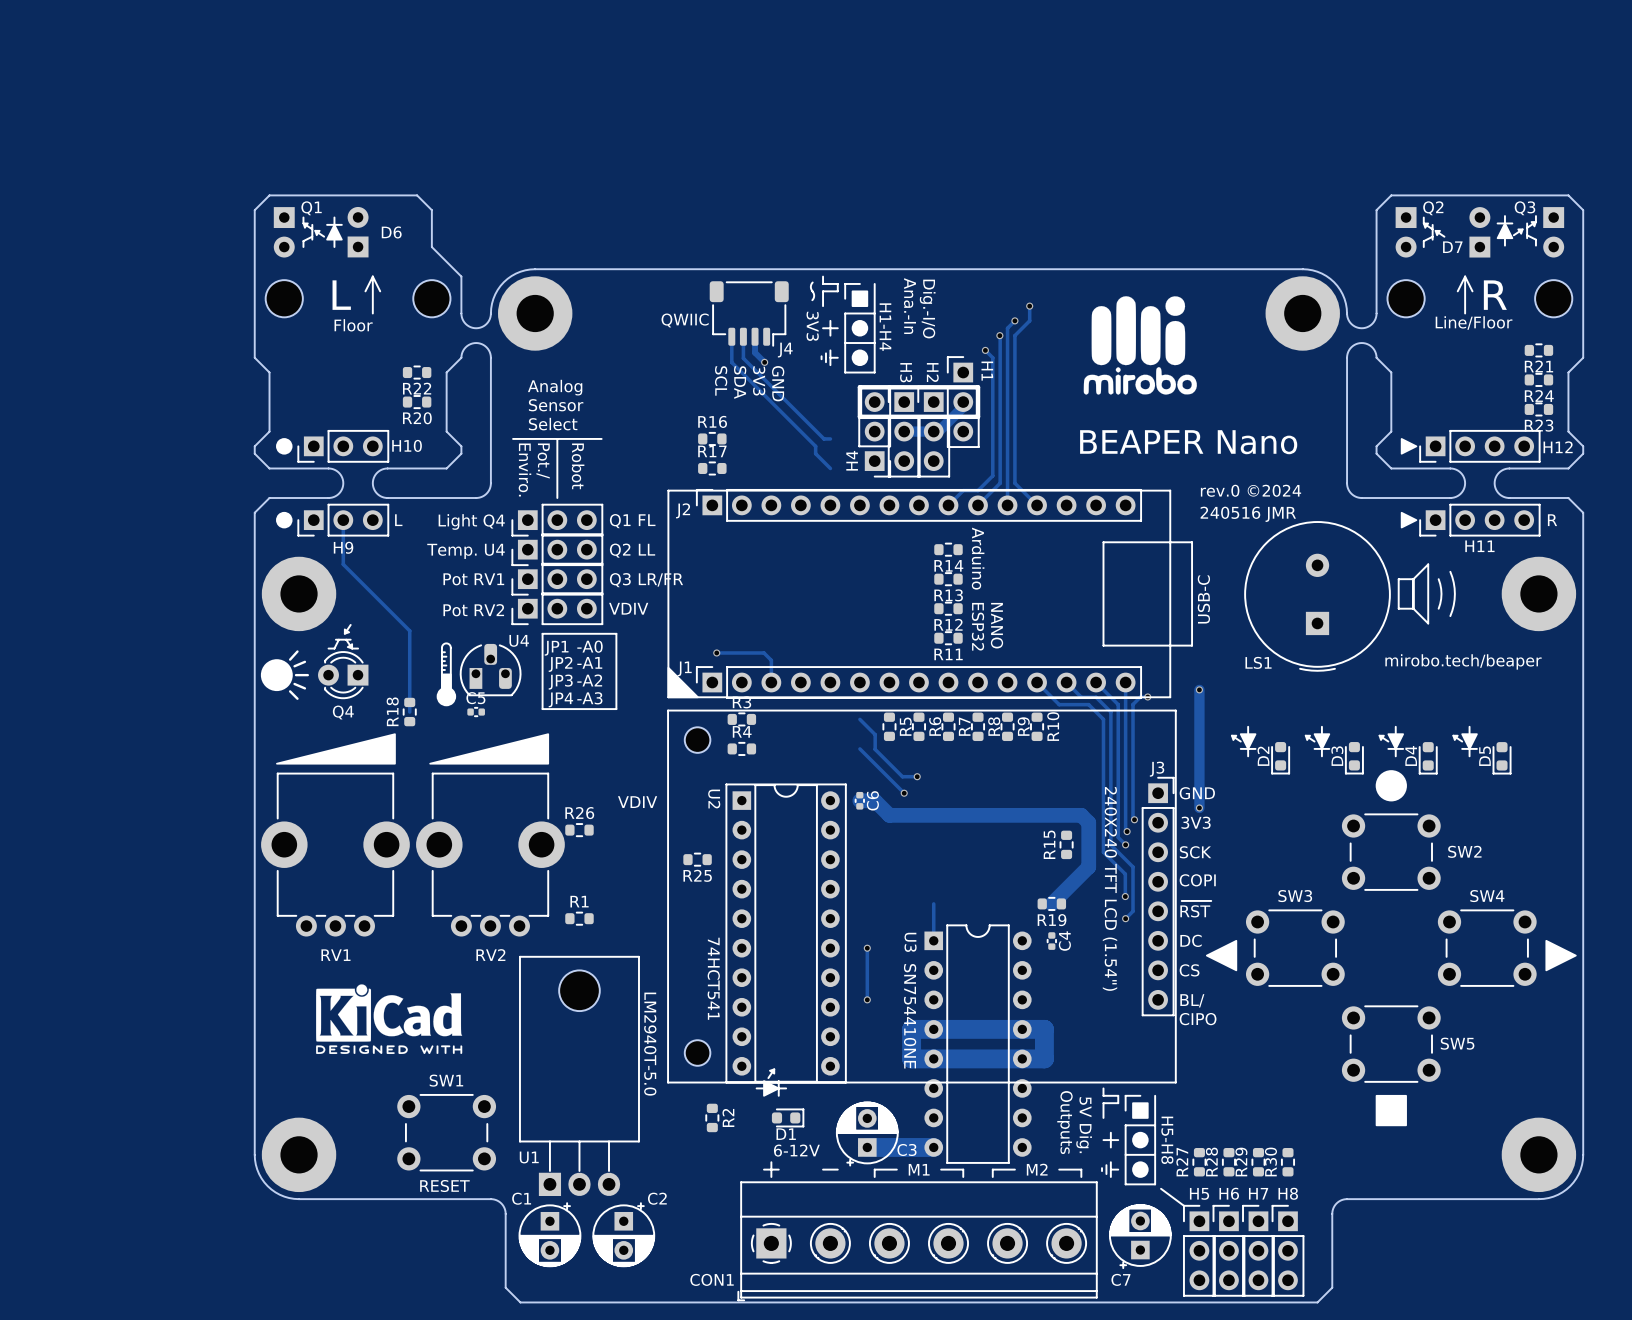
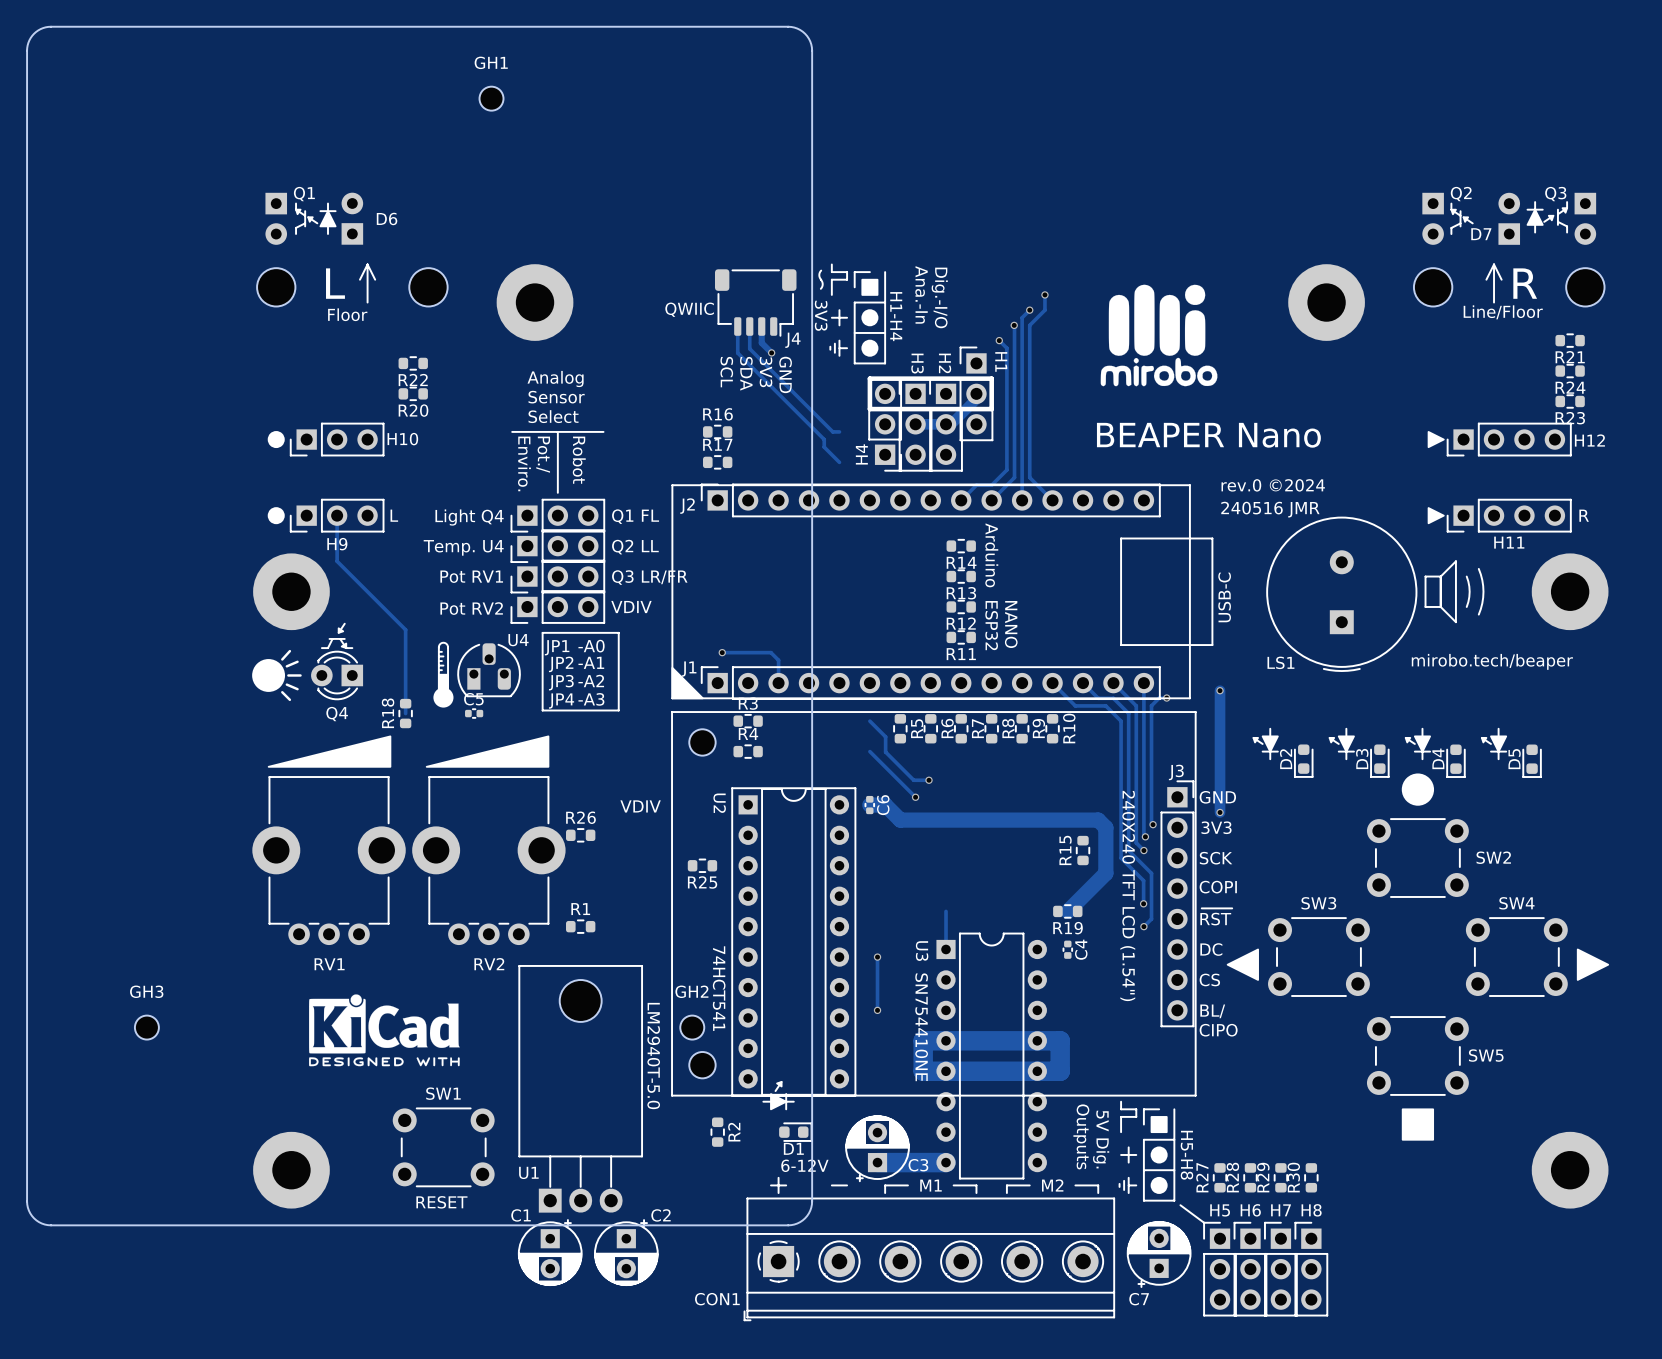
board edge: none -> (51, 26) (788, 26) (800, 29) (808, 38) (812, 50) (812, 1201) (808, 1213) (800, 1222) (788, 1225) (51, 1225) (39, 1222) (30, 1213) (27, 1201) (27, 50) (29, 40) (34, 33) (43, 28) (51, 26)
GH1: none -> (491, 98)
board edge: (269, 195) (254, 210) (254, 357) (269, 372) (269, 431) (254, 446) (254, 453) (269, 468) (333, 469) (340, 474) (343, 483) (340, 491) (333, 497) (269, 498) (254, 512) (254, 1154) (259, 1174) (271, 1189) (284, 1196) (299, 1199) (497, 1200) (502, 1204) (505, 1212) (505, 1287) (520, 1302) (1317, 1302) (1332, 1287) (1332, 1212) (1335, 1204) (1340, 1200) (1543, 1198) (1558, 1194) (1573, 1182) (1580, 1169) (1583, 1154) (1583, 512) (1568, 498) (1504, 497) (1497, 491) (1494, 483) (1497, 474) (1504, 469) (1568, 468) (1583, 453) (1583, 446) (1568, 431) (1568, 372) (1583, 357) (1583, 210) (1568, 195) (1391, 195) (1376, 210) (1376, 317) (1370, 325) (1361, 328) (1353, 325) (1348, 320) (1344, 298) (1334, 282) (1317, 271) (1302, 269) (530, 269) (515, 273) (503, 282) (493, 298) (488, 320) (483, 326) (474, 328) (465, 323) (461, 317) (461, 276) (431, 247) (431, 210) (417, 195) (269, 195) -> none
board edge: (461, 357) (446, 372) (446, 431) (461, 446) (461, 453) (446, 468) (387, 468) (380, 470) (375, 474) (372, 483) (375, 491) (380, 496) (387, 498) (476, 498) (482, 496) (488, 491) (490, 483) (490, 353) (485, 346) (474, 343) (465, 347) (461, 357) -> none
board edge: (1347, 357) (1347, 483) (1350, 492) (1361, 498) (1450, 498) (1459, 494) (1464, 488) (1464, 481) (1457, 470) (1450, 468) (1391, 468) (1376, 453) (1376, 446) (1391, 431) (1391, 372) (1376, 357) (1372, 347) (1365, 343) (1352, 346) (1347, 357) -> none
GH3: none -> (146, 1027)
GH2: none -> (692, 1027)

